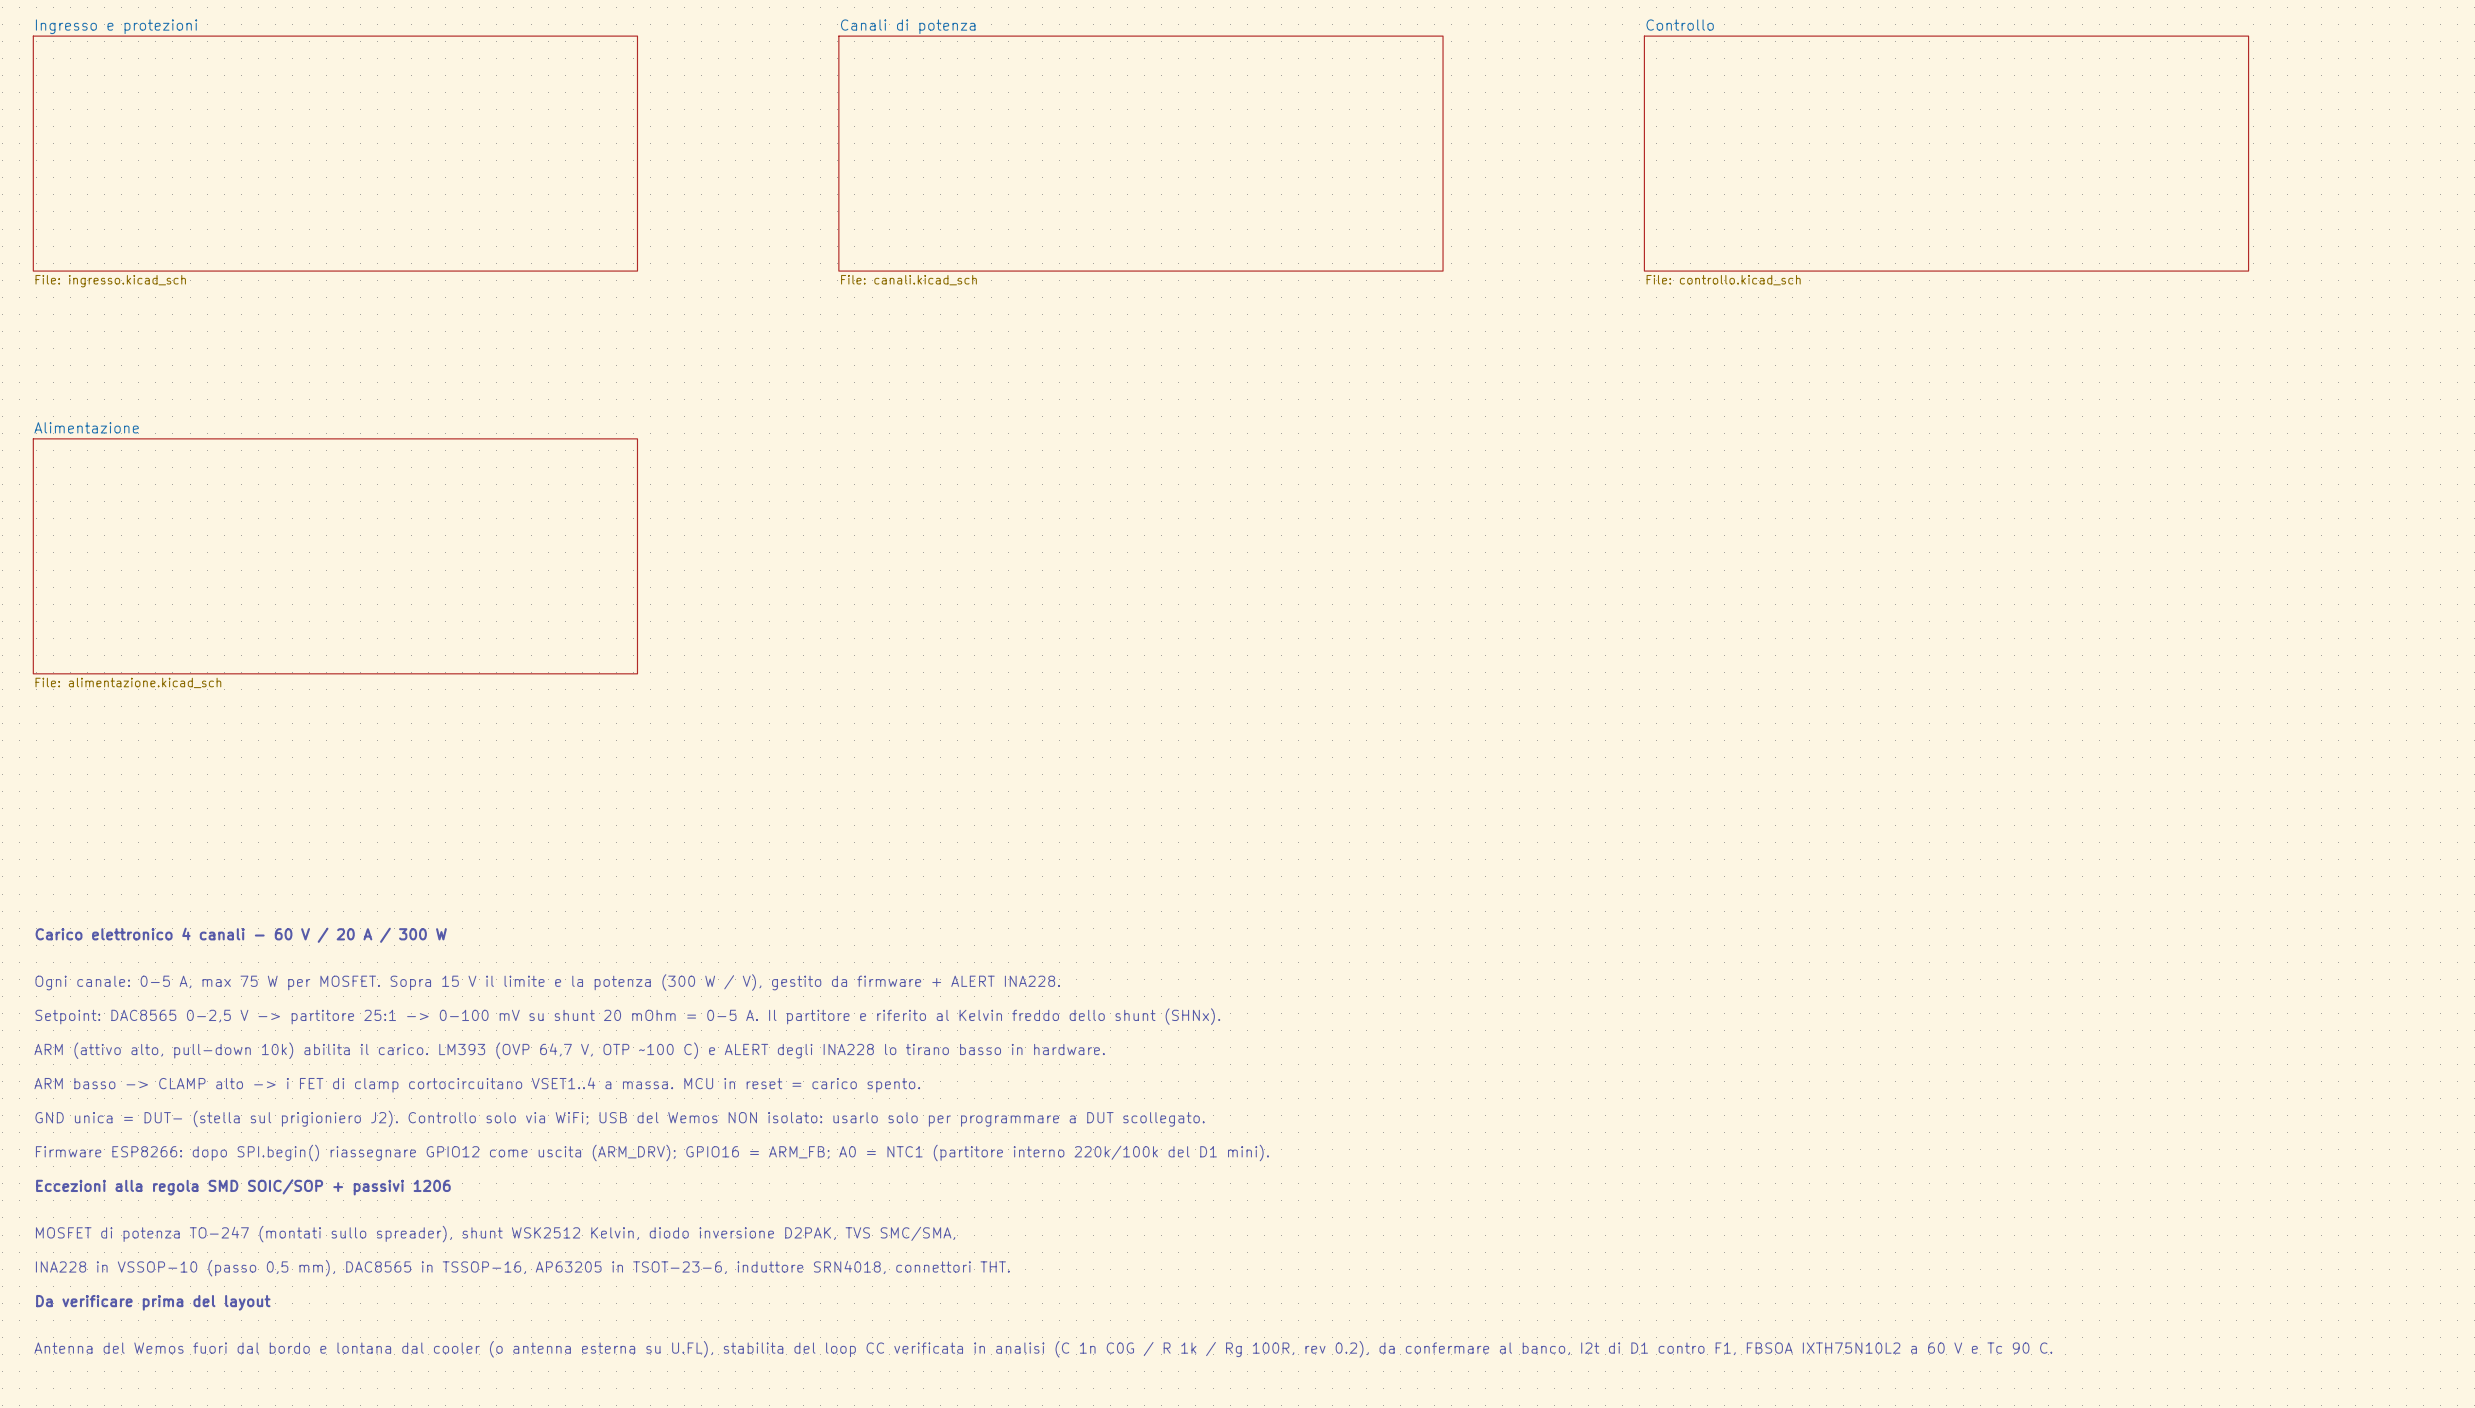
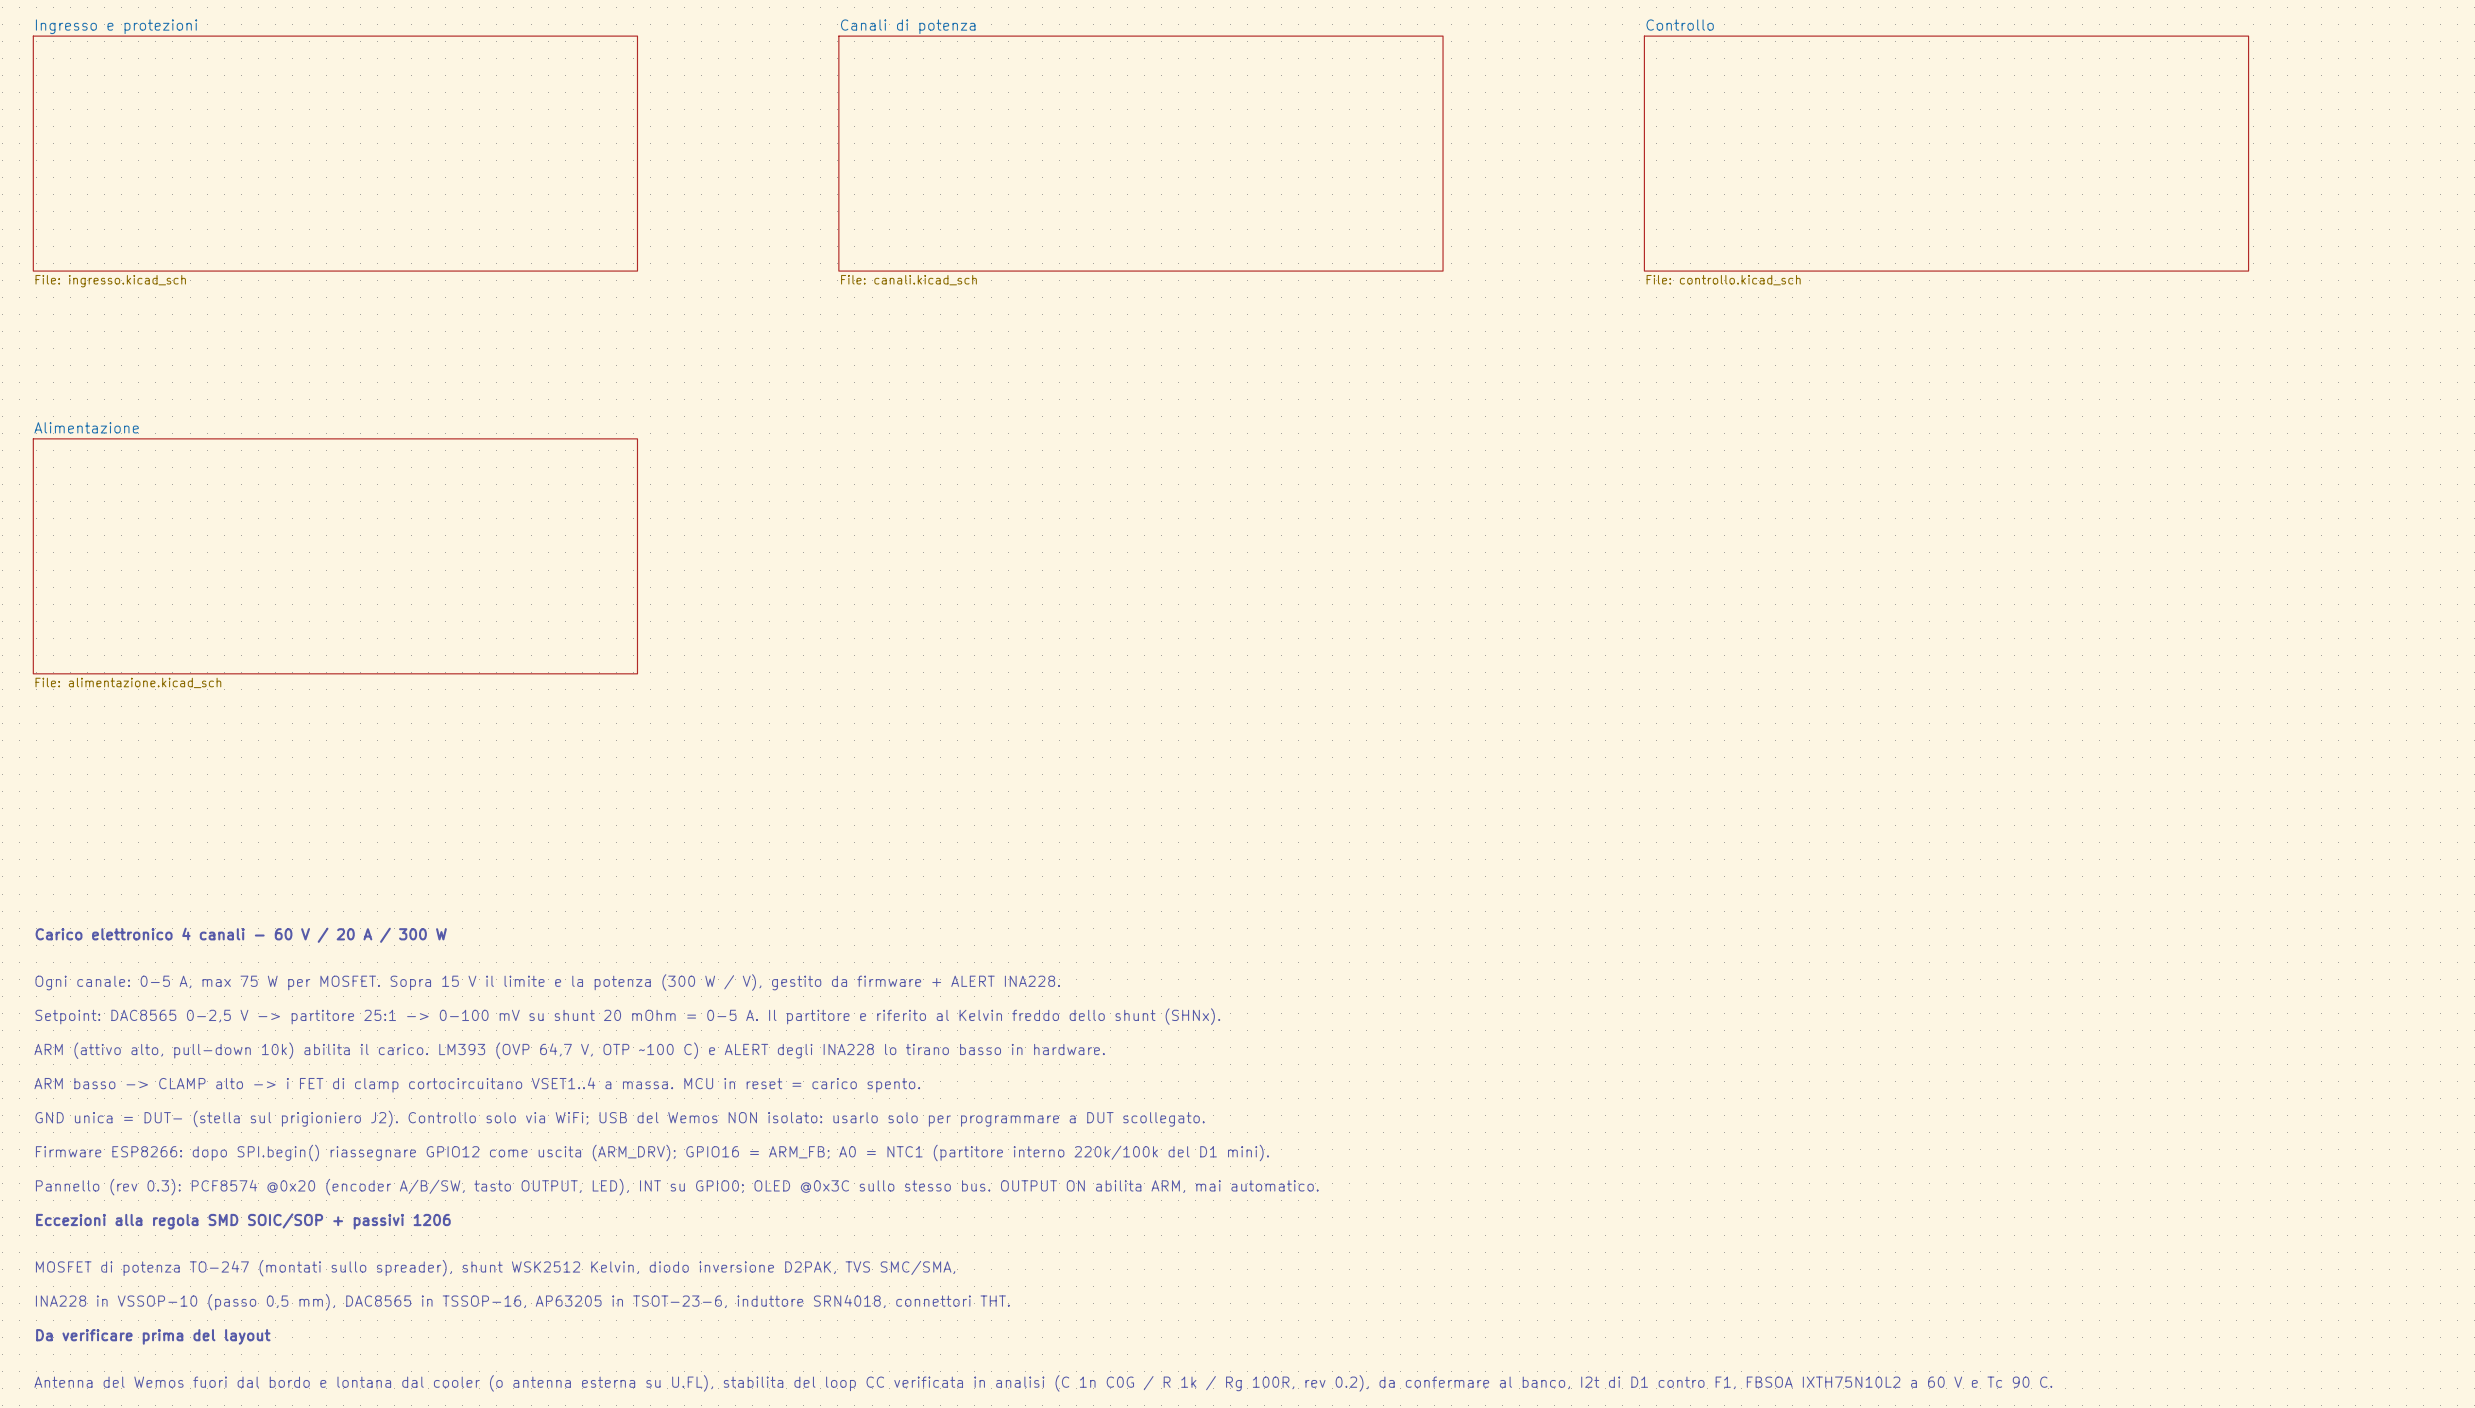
text: Eccezioni alla regola SMD SOIC/SOP + passivi 1206 (243, 1187) -> Pannello (rev 0.3): PCF8574 @0x20 (encoder A/B/SW, tasto OUTPUT, LED), INT su GPIO0; OLED @0x3C sullo stesso bus. OUTPUT ON abilita ARM, mai automatico. (677, 1187)
text: none -> Eccezioni alla regola SMD SOIC/SOP + passivi 1206 (243, 1221)
text: MOSFET di potenza TO-247 (montati sullo spreader), shunt WSK2512 Kelvin, diodo inversione D2PAK, TVS SMC/SMA, (495, 1234) -> none
text: INA228 in VSSOP-10 (passo 0,5 mm), DAC8565 in TSSOP-16, AP63205 in TSOT-23-6, induttore SRN4018, connettori THT. (522, 1268) -> MOSFET di potenza TO-247 (montati sullo spreader), shunt WSK2512 Kelvin, diodo inversione D2PAK, TVS SMC/SMA, (495, 1268)
text: Da verificare prima del layout (153, 1302) -> INA228 in VSSOP-10 (passo 0,5 mm), DAC8565 in TSSOP-16, AP63205 in TSOT-23-6, induttore SRN4018, connettori THT. (522, 1302)
text: none -> Da verificare prima del layout (153, 1336)
text position: Antenna del Wemos fuori dal bordo e lontana dal cooler (o antenna esterna su U.FL), stabilita del loop CC verificata in analisi (C 1n C0G / R 1k / Rg 100R, rev 0.2), da confermare al banco, I2t di D1 contro F1, FBSOA IXTH75N10L2 a 60 V e Tc 90 C. (1043, 1349) -> Antenna del Wemos fuori dal bordo e lontana dal cooler (o antenna esterna su U.FL), stabilita del loop CC verificata in analisi (C 1n C0G / R 1k / Rg 100R, rev 0.2), da confermare al banco, I2t di D1 contro F1, FBSOA IXTH75N10L2 a 60 V e Tc 90 C. (1043, 1383)

